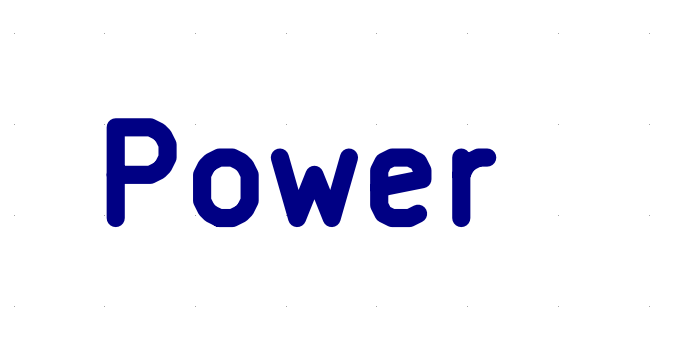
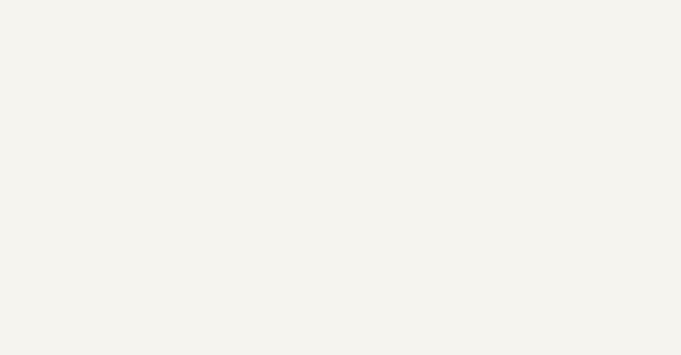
text: Power (301, 172) -> none

